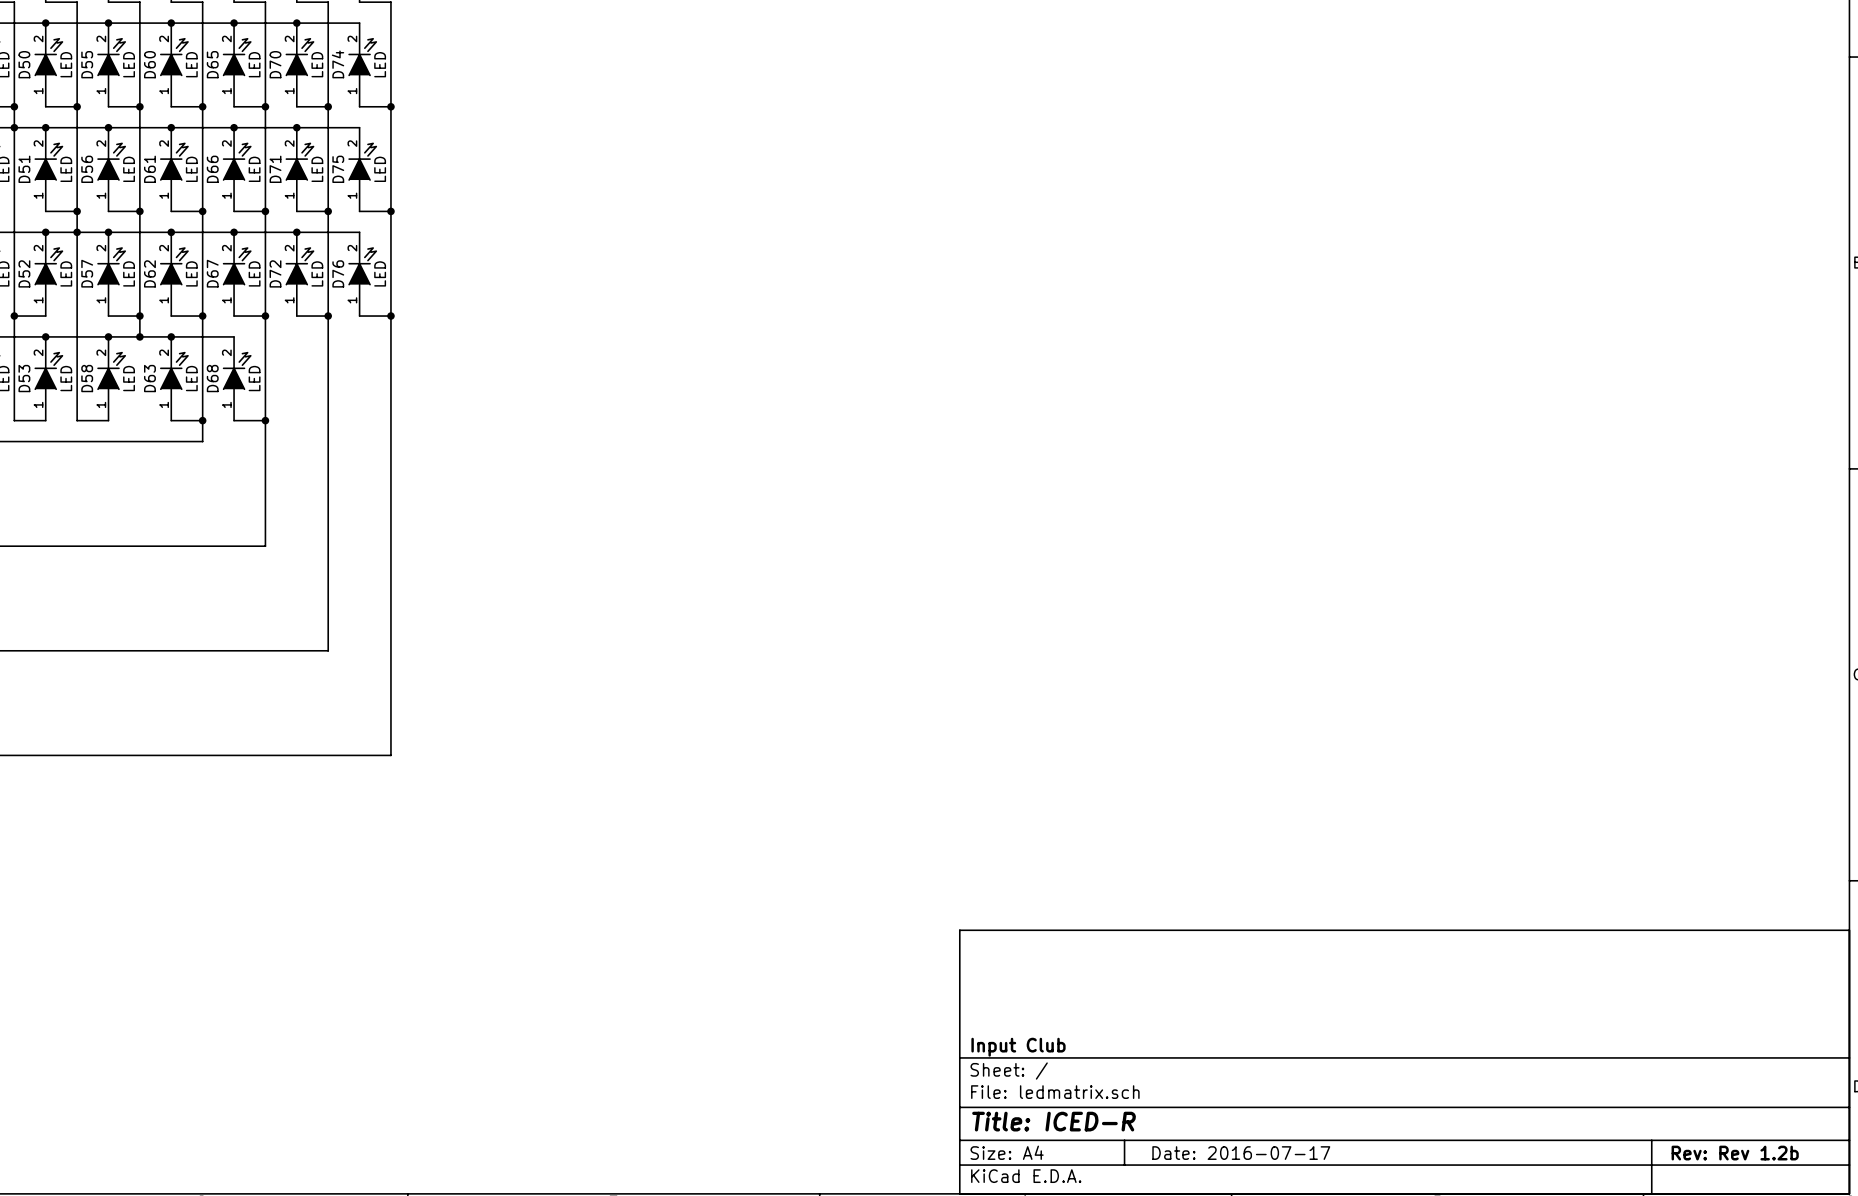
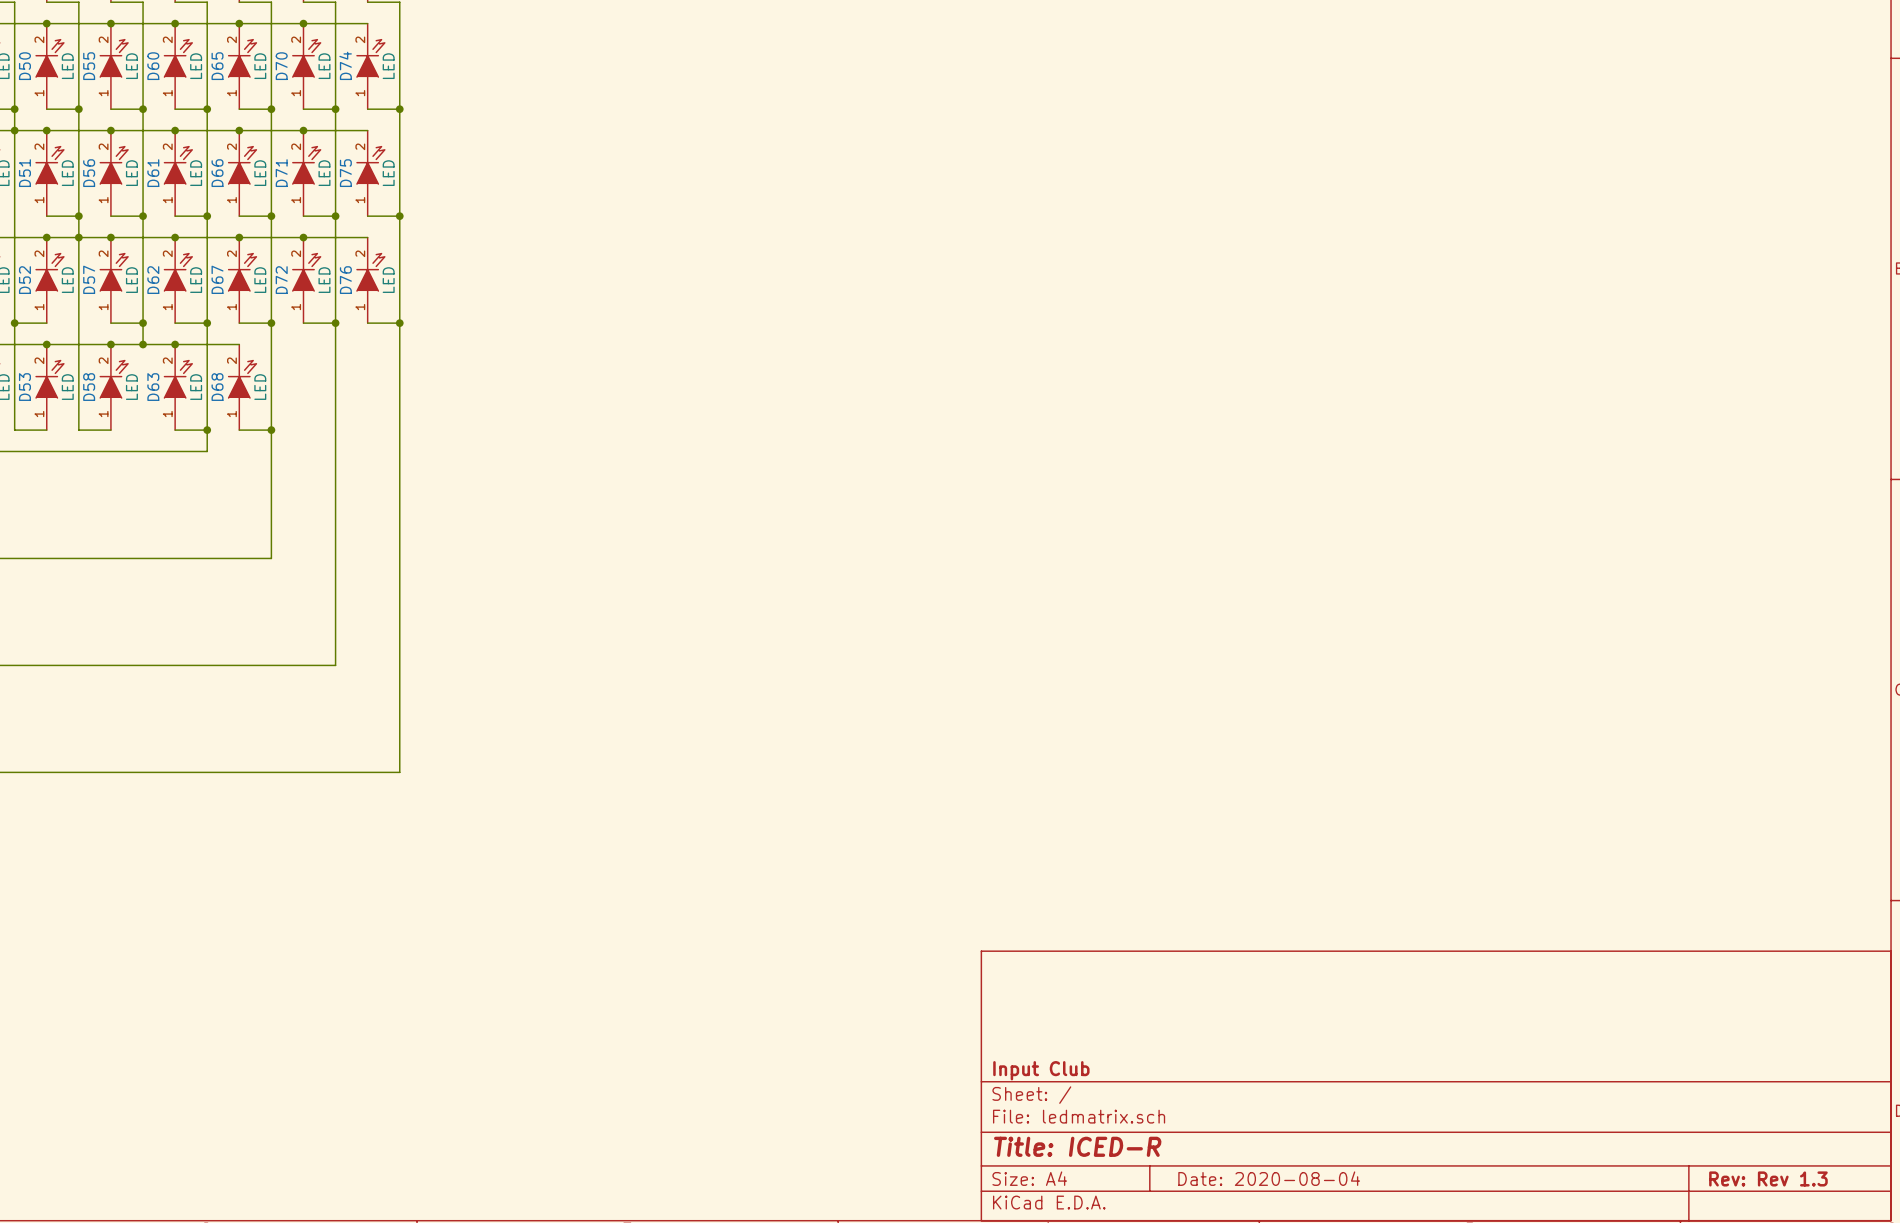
title block: Date: 2016-07-17 (1241, 1153) -> Date: 2020-08-04 (1269, 1178)
title block: Rev: Rev 1.2b (1735, 1153) -> Rev: Rev 1.3 (1768, 1178)

